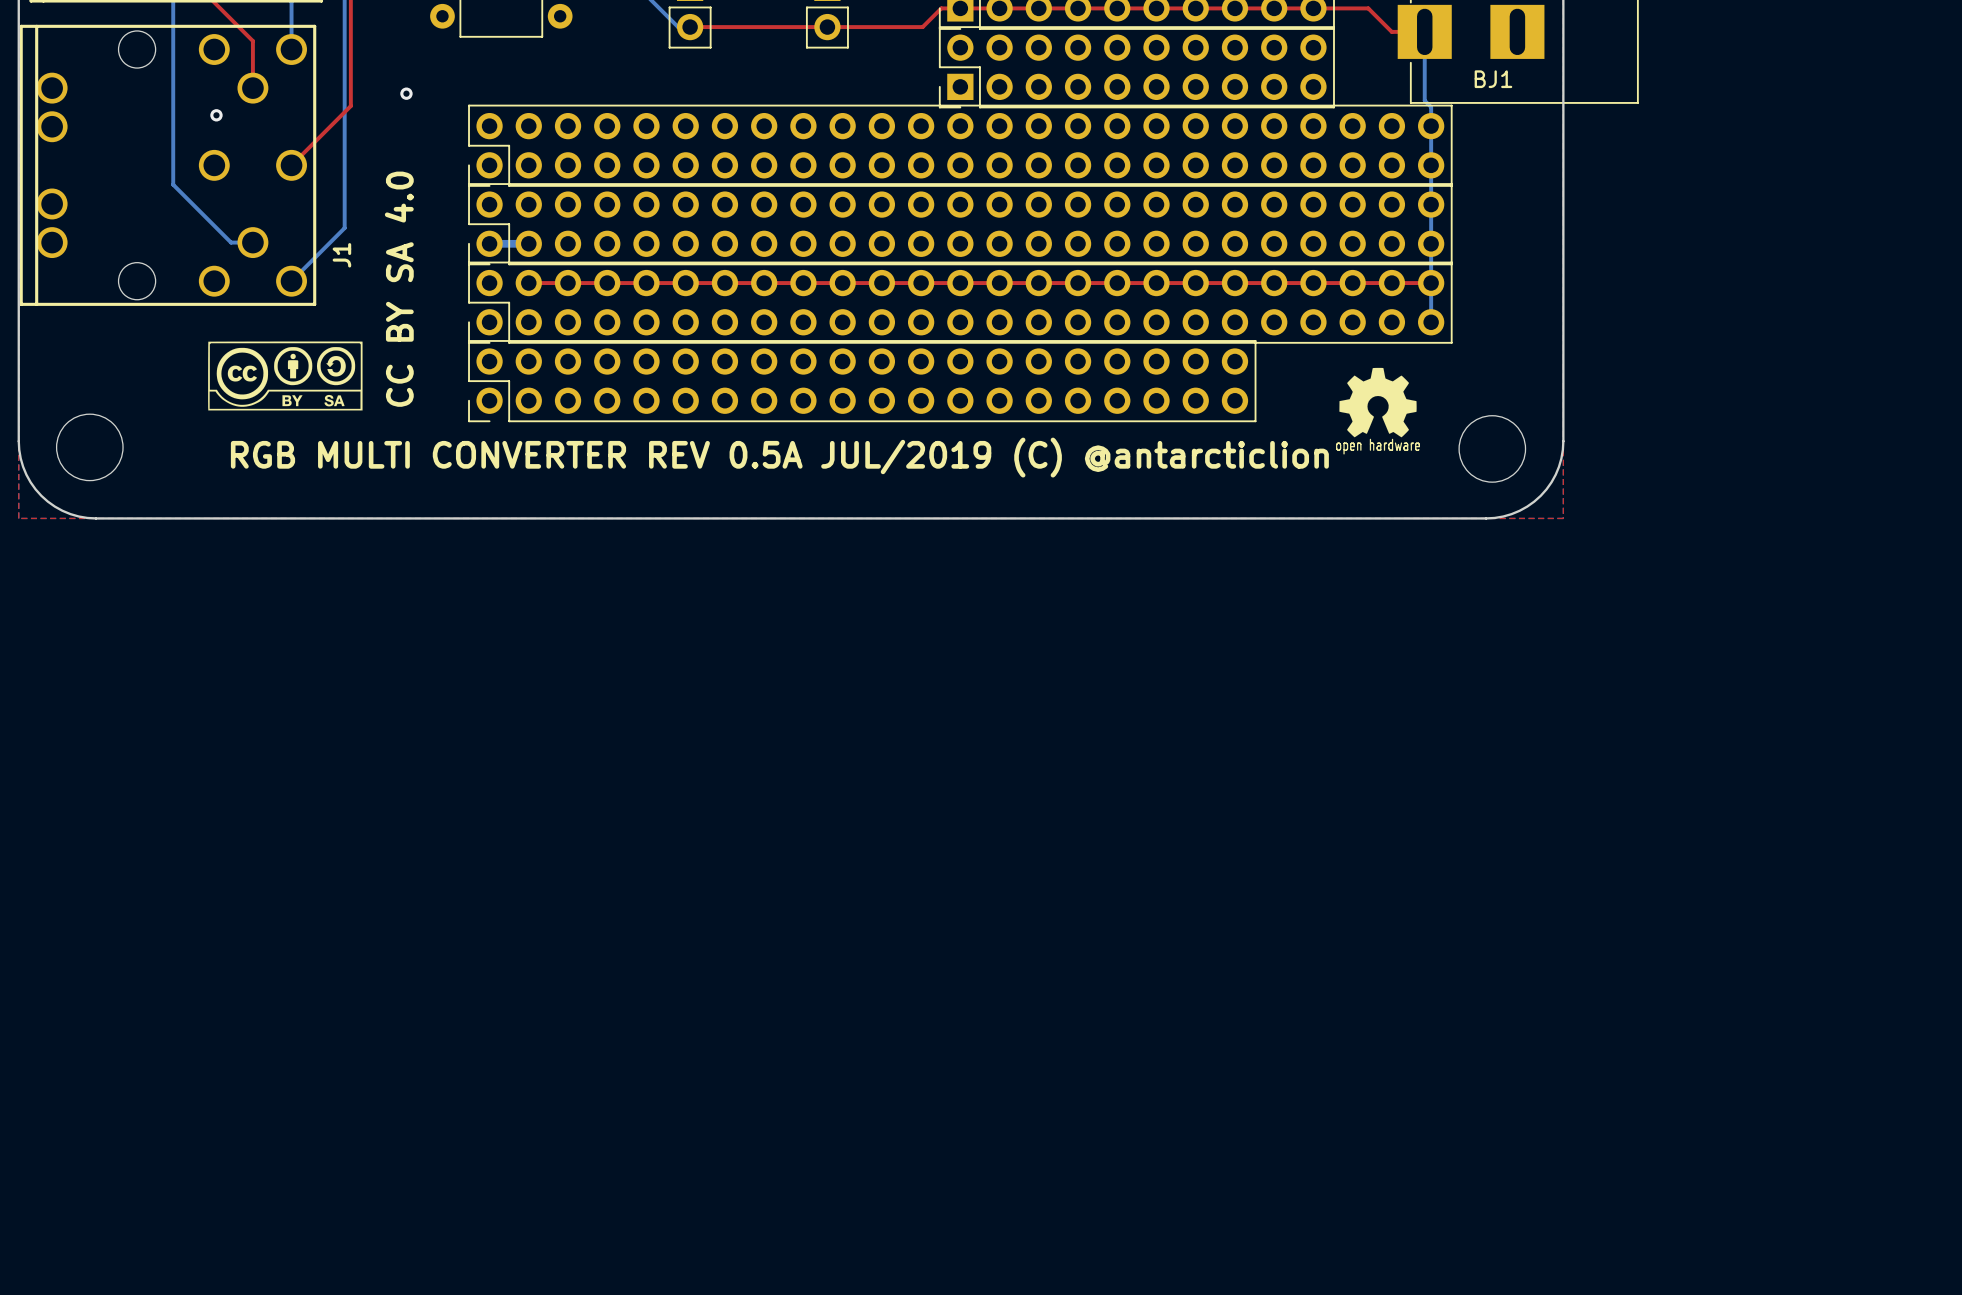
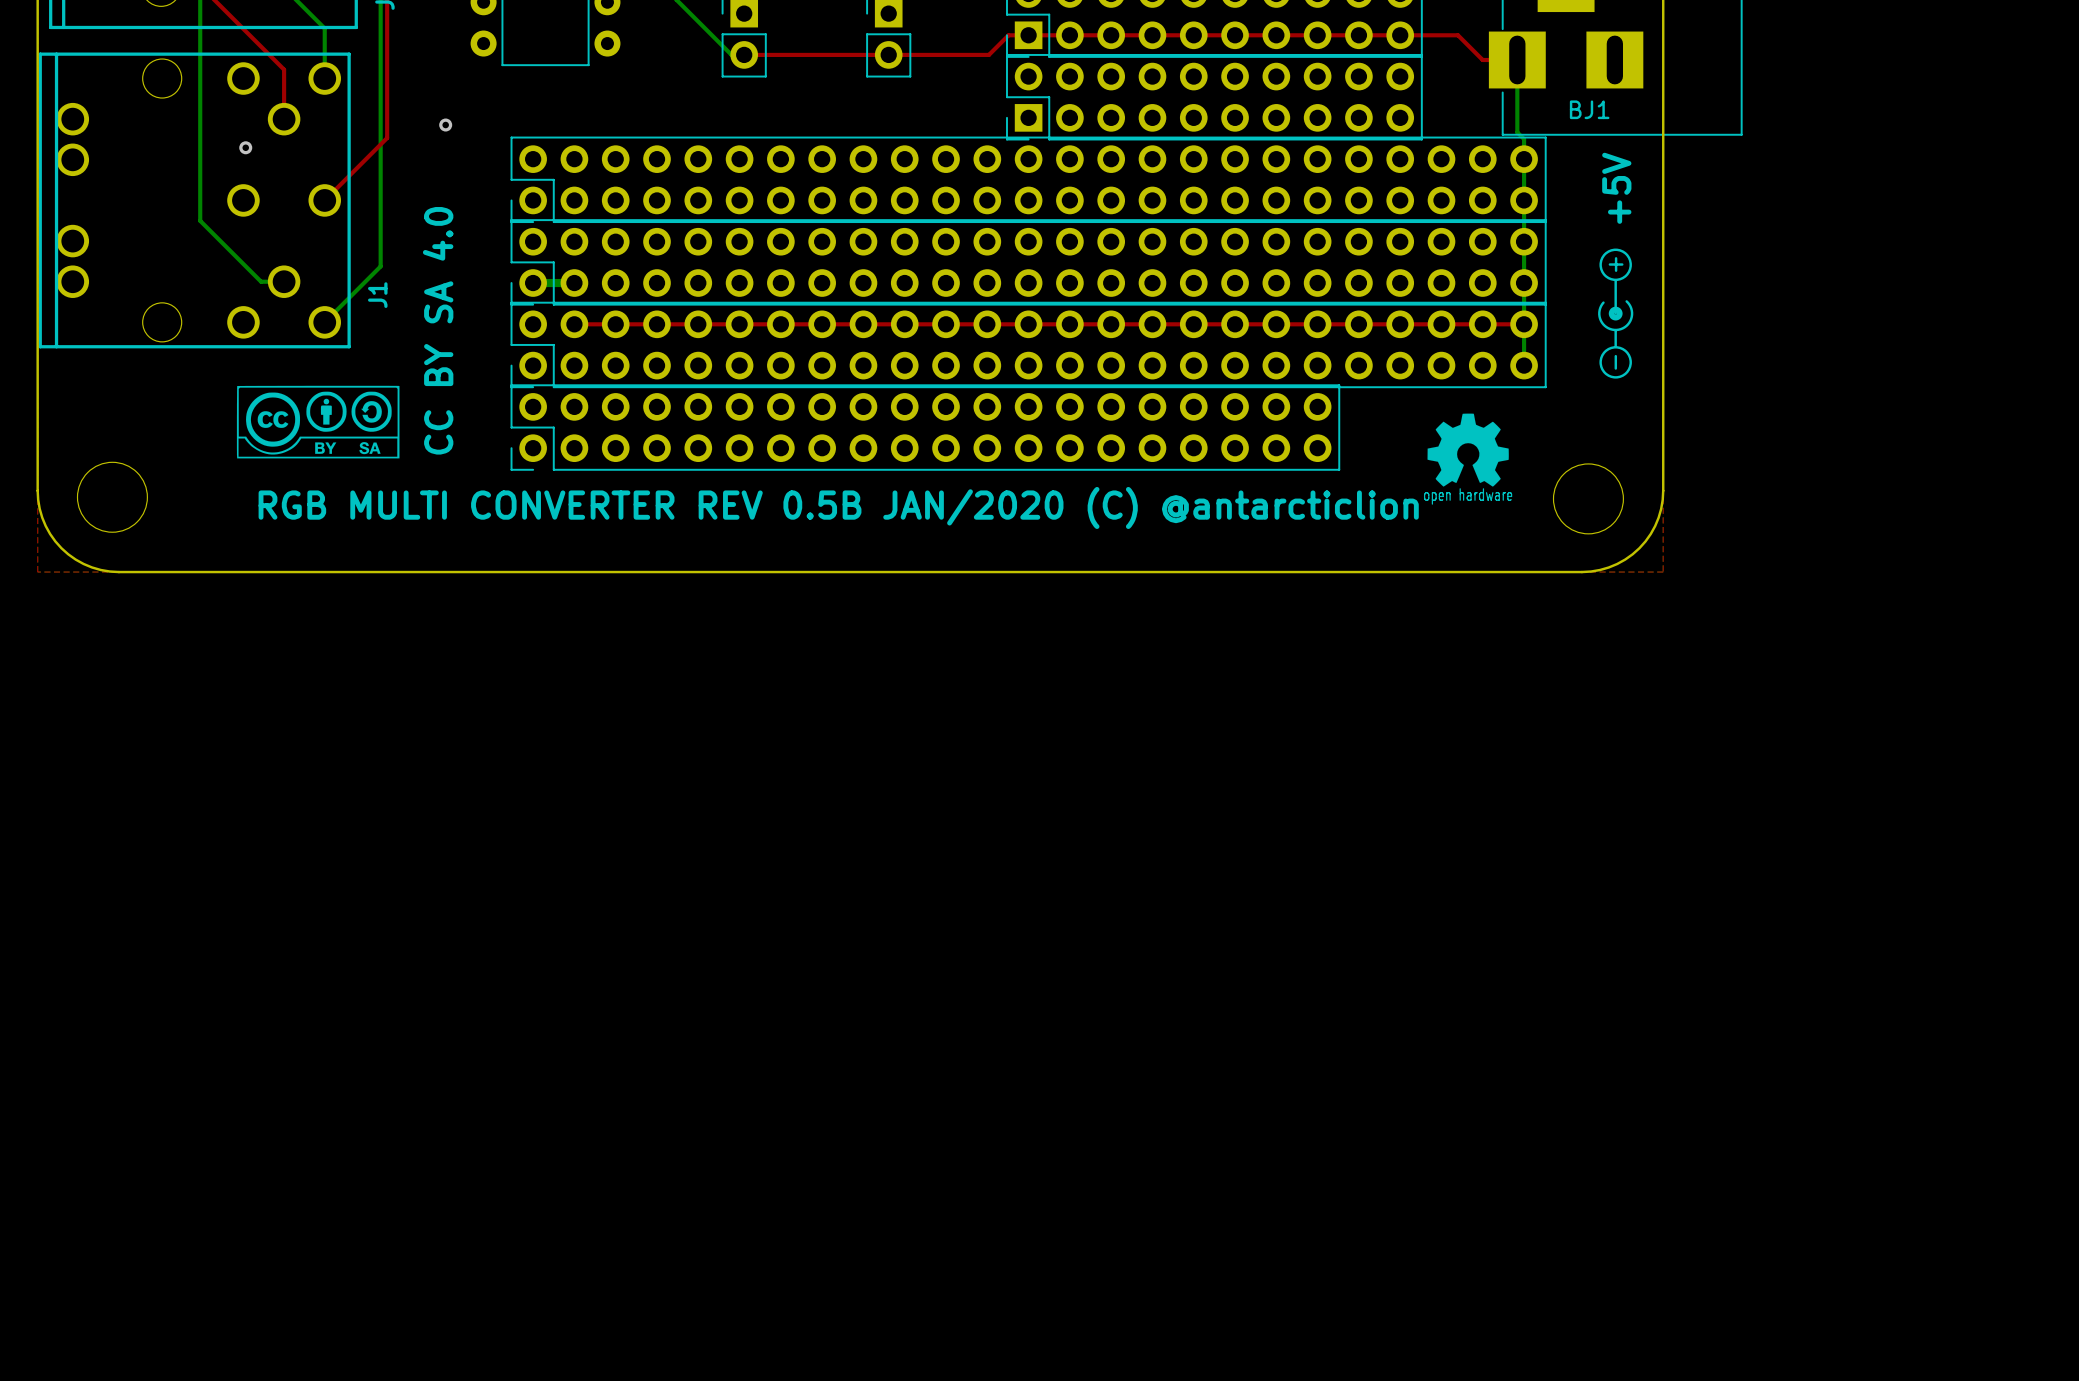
text: none -> +5V (1616, 188)
drawing: none -> [1598, 248, 1634, 379]
text: none -> + (1616, 264)
text: none -> - (1615, 362)
text: RGB MULTI CONVERTER REV 0.5A JUL/2019 (C) @antarcticlion (779, 457) -> RGB MULTI CONVERTER REV 0.5B JAN/2020 (C) @antarcticlion (838, 507)

